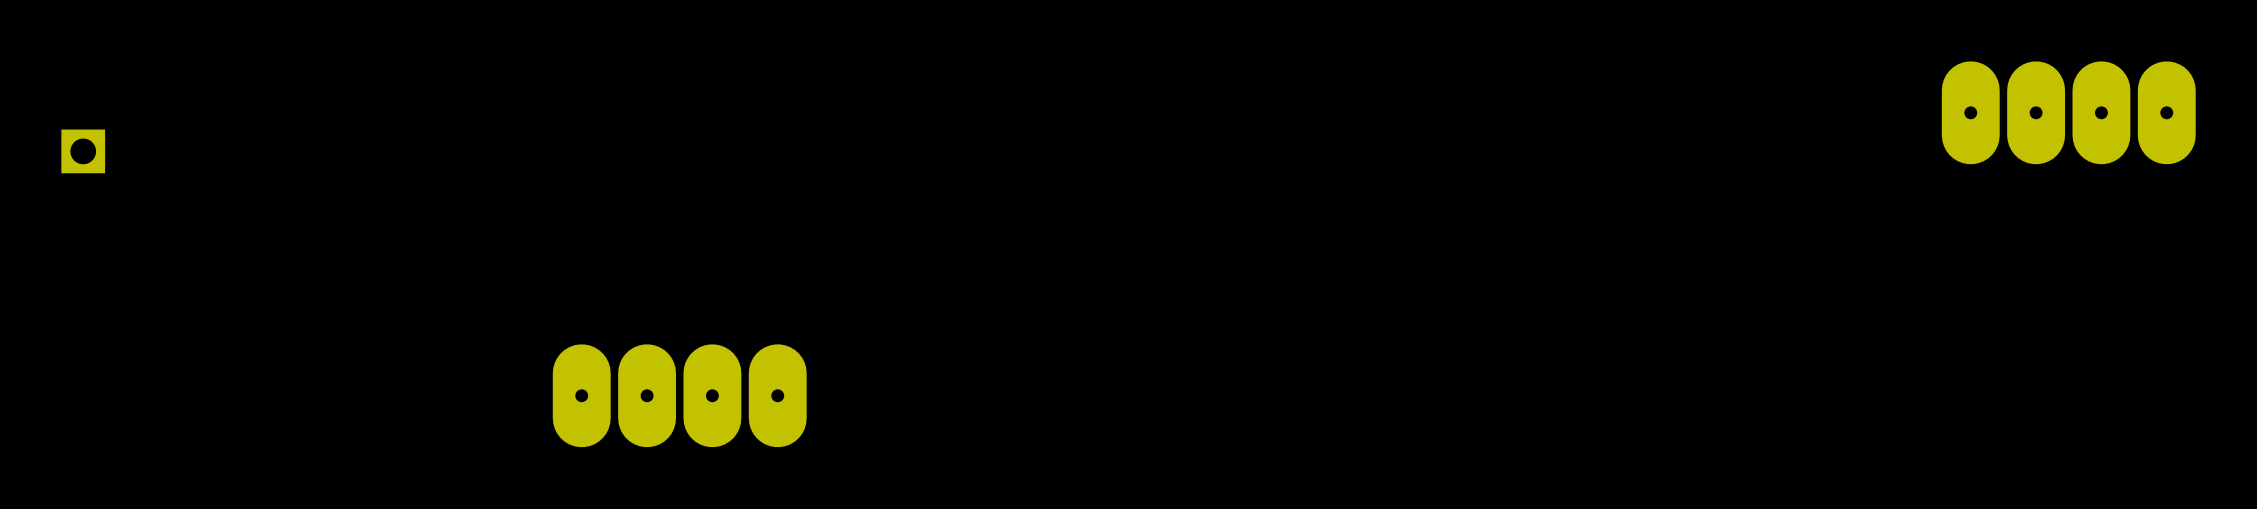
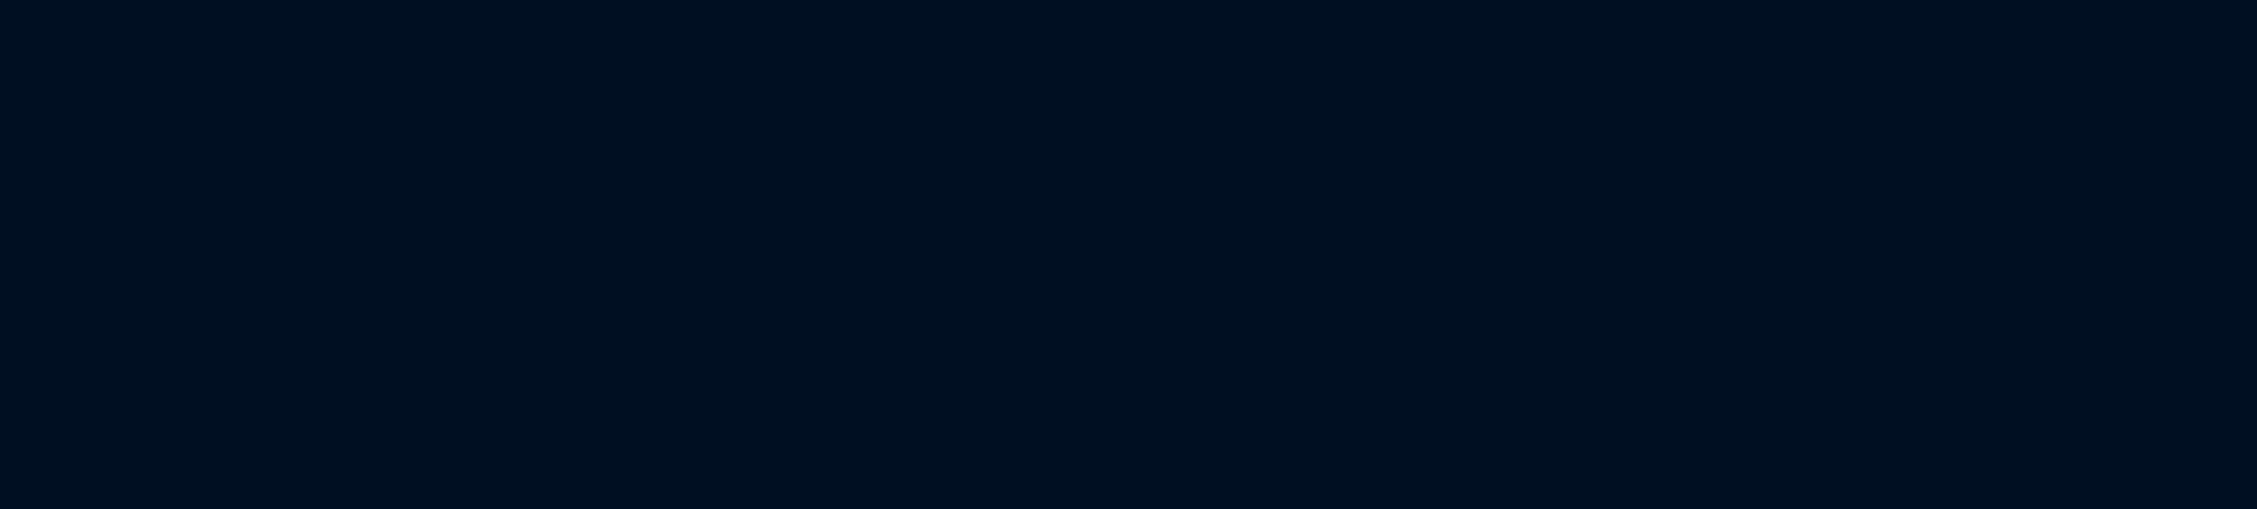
part: (2068, 112) -> none
part: (83, 151) -> none
part: (679, 395) -> none

